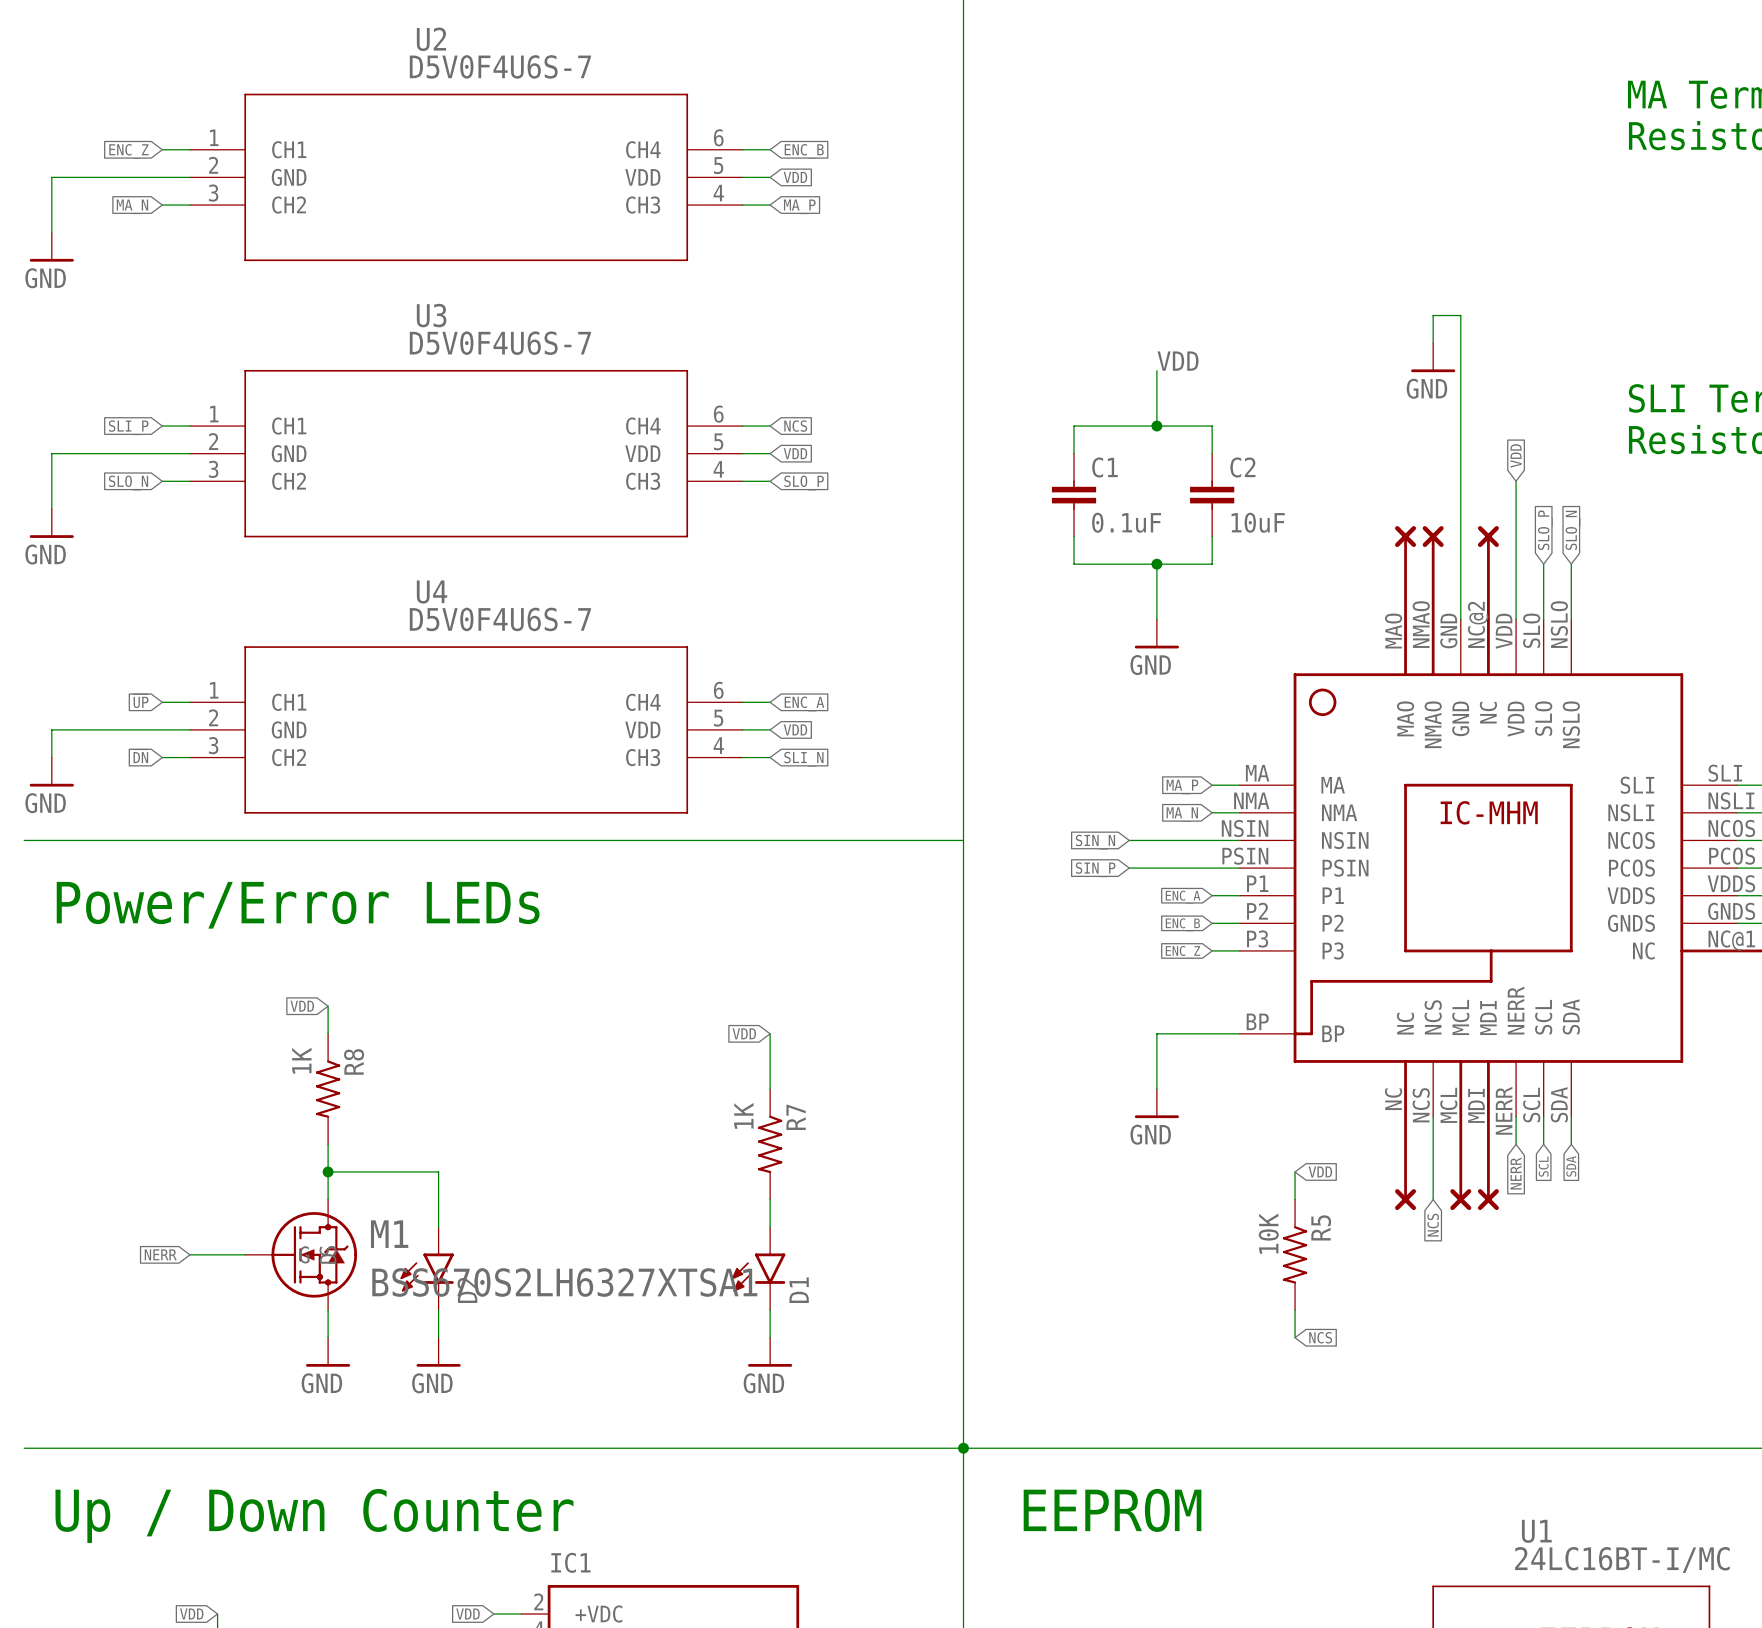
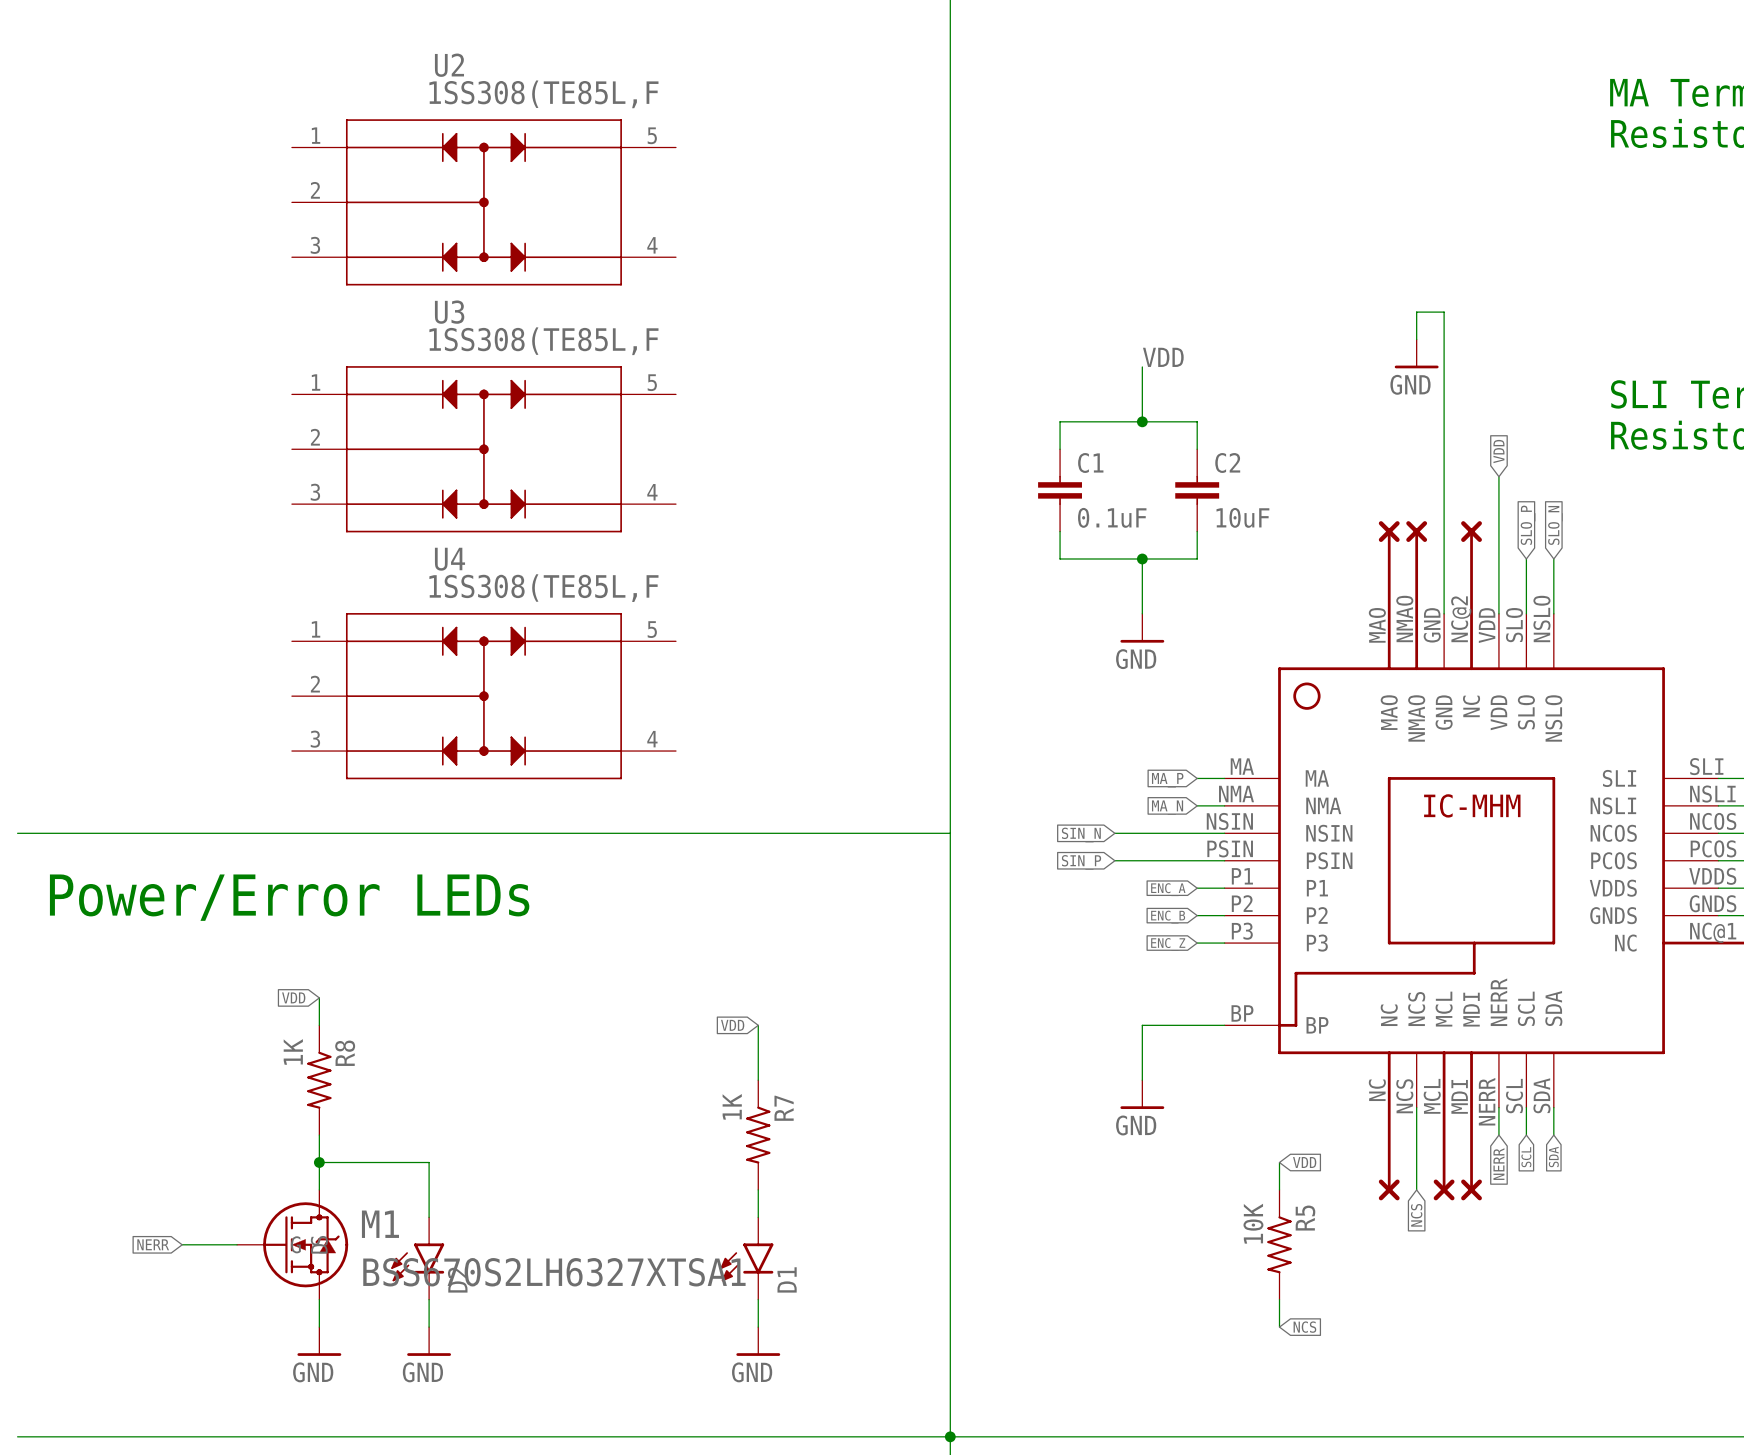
U2 value: D5V0F4U6S-7 (500, 66) -> 1SS308(TE85L,F (543, 94)
U2 symbol: [189, 93, 743, 262] -> [291, 119, 676, 286]
wire: (162, 149) (189, 149) -> none
wire: (742, 149) (770, 149) -> none
global label: ENC_Z (128, 151) -> none
global label: ENC_B (804, 151) -> none
wire: (189, 177) (51, 177) (51, 232) -> none
wire: (742, 177) (770, 177) -> none
global label: VDD (795, 177) -> none
wire: (162, 205) (189, 205) -> none
wire: (742, 205) (770, 205) -> none
global label: MA_N (132, 206) -> none
global label: MA_P (799, 206) -> none
power symbol: GND (51, 247) -> none
U3 value: D5V0F4U6S-7 (500, 343) -> 1SS308(TE85L,F (543, 341)
U3 symbol: [189, 369, 743, 538] -> [291, 366, 676, 533]
wire: (162, 426) (189, 426) -> none
wire: (742, 426) (770, 426) -> none
global label: NCS (795, 426) -> none
global label: SLI_P (128, 427) -> none
wire: (189, 453) (51, 453) (51, 508) -> none
wire: (742, 453) (770, 453) -> none
global label: VDD (795, 453) -> none
wire: (162, 481) (189, 481) -> none
wire: (742, 481) (770, 481) -> none
global label: SLO_N (128, 482) -> none
global label: SLO_P (804, 482) -> none
power symbol: GND (51, 523) -> none
U4 value: D5V0F4U6S-7 (500, 619) -> 1SS308(TE85L,F (543, 588)
U4 symbol: [189, 646, 743, 814] -> [291, 613, 676, 780]
global label: ~{UP} (141, 701) -> none
wire: (162, 702) (189, 702) -> none
wire: (742, 702) (770, 702) -> none
global label: ENC_A (804, 703) -> none
wire: (189, 729) (51, 729) (51, 757) -> none
wire: (742, 729) (770, 729) -> none
global label: VDD (795, 729) -> none
global label: ~{DN} (140, 756) -> none
wire: (162, 757) (189, 757) -> none
wire: (742, 757) (770, 757) -> none
global label: SLI_N (803, 759) -> none
power symbol: GND (51, 772) -> none

